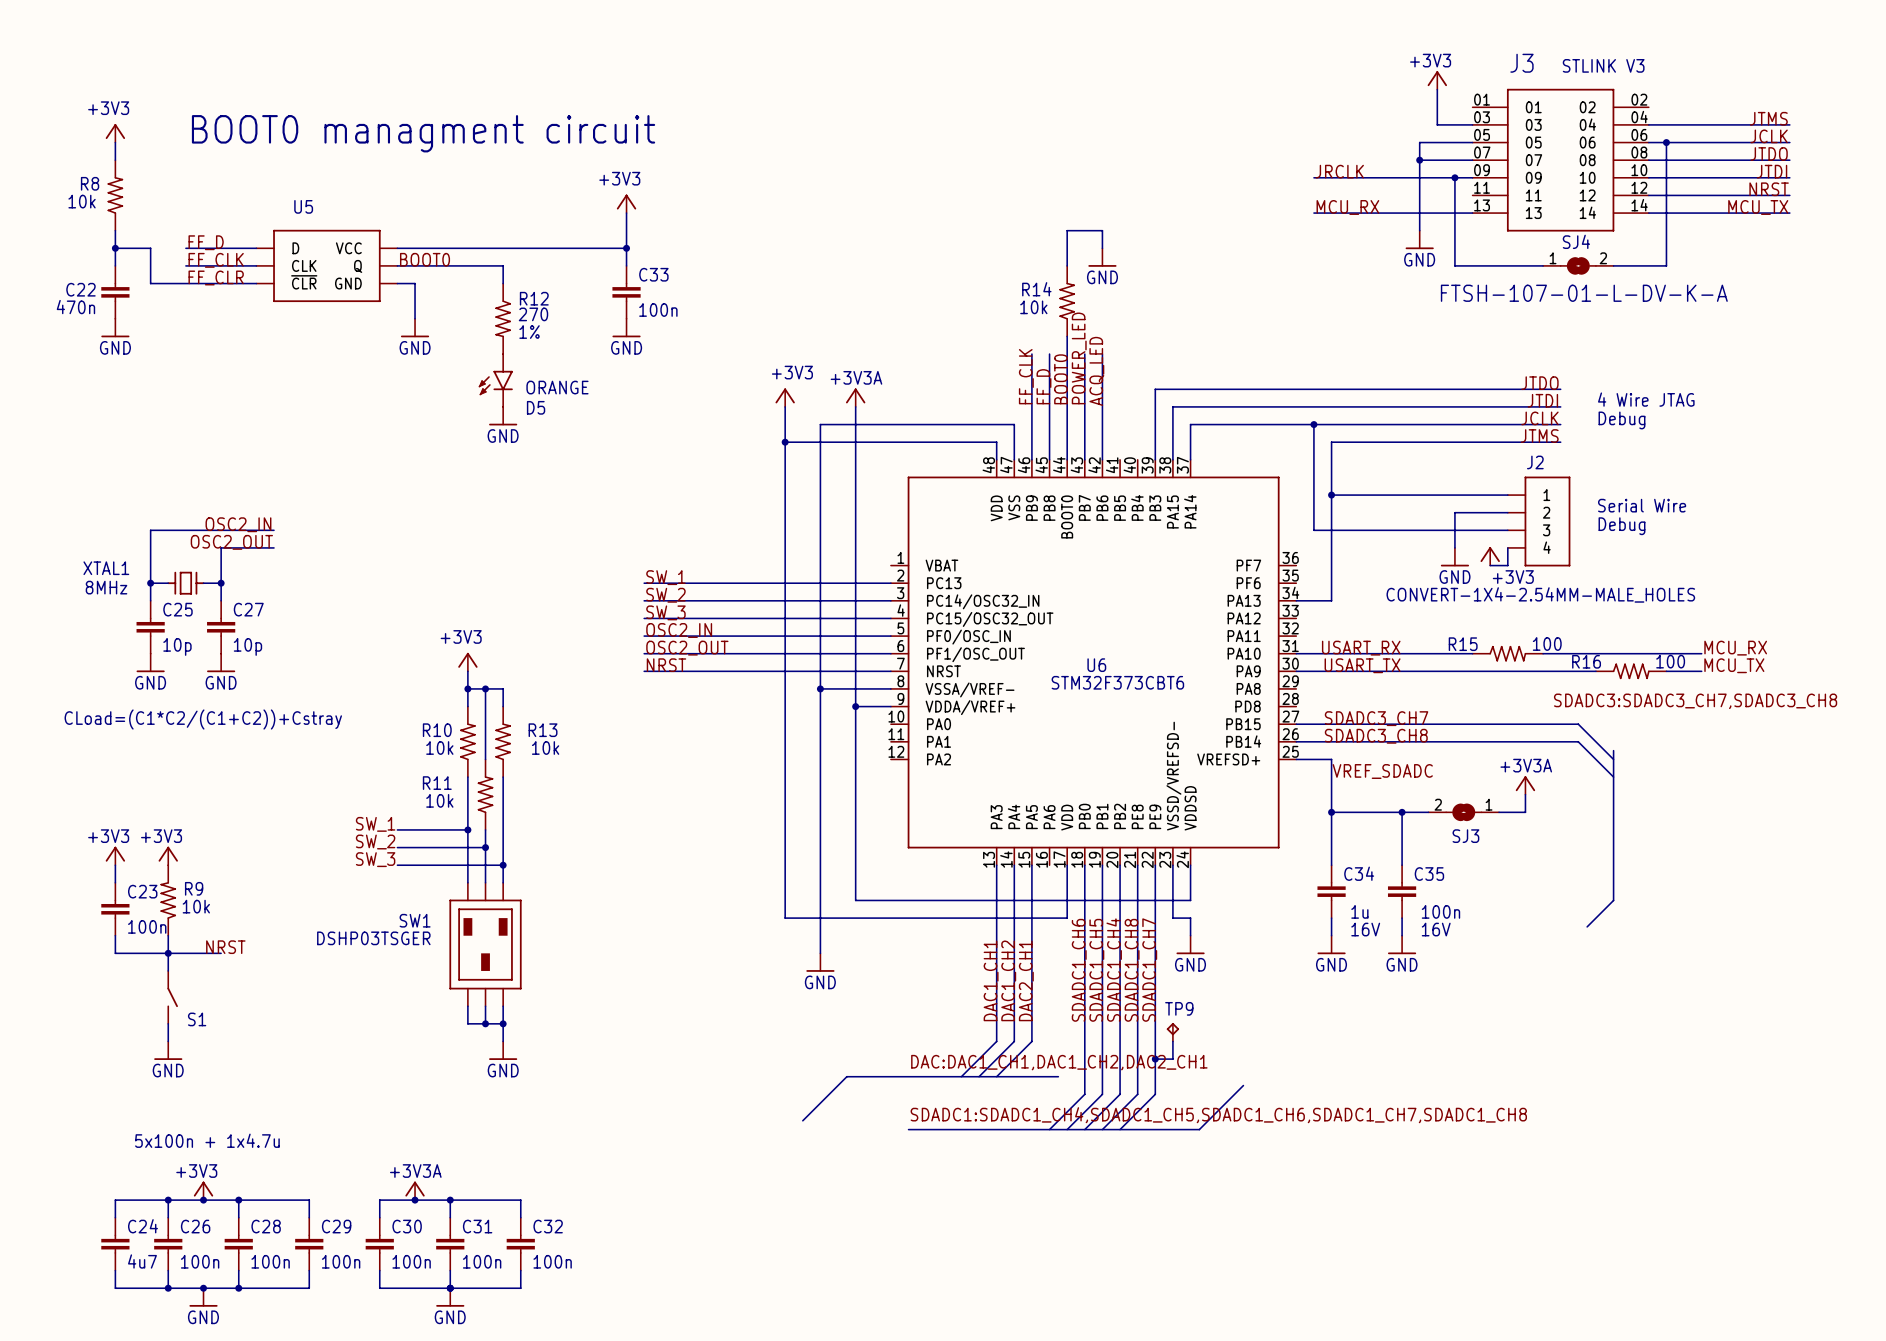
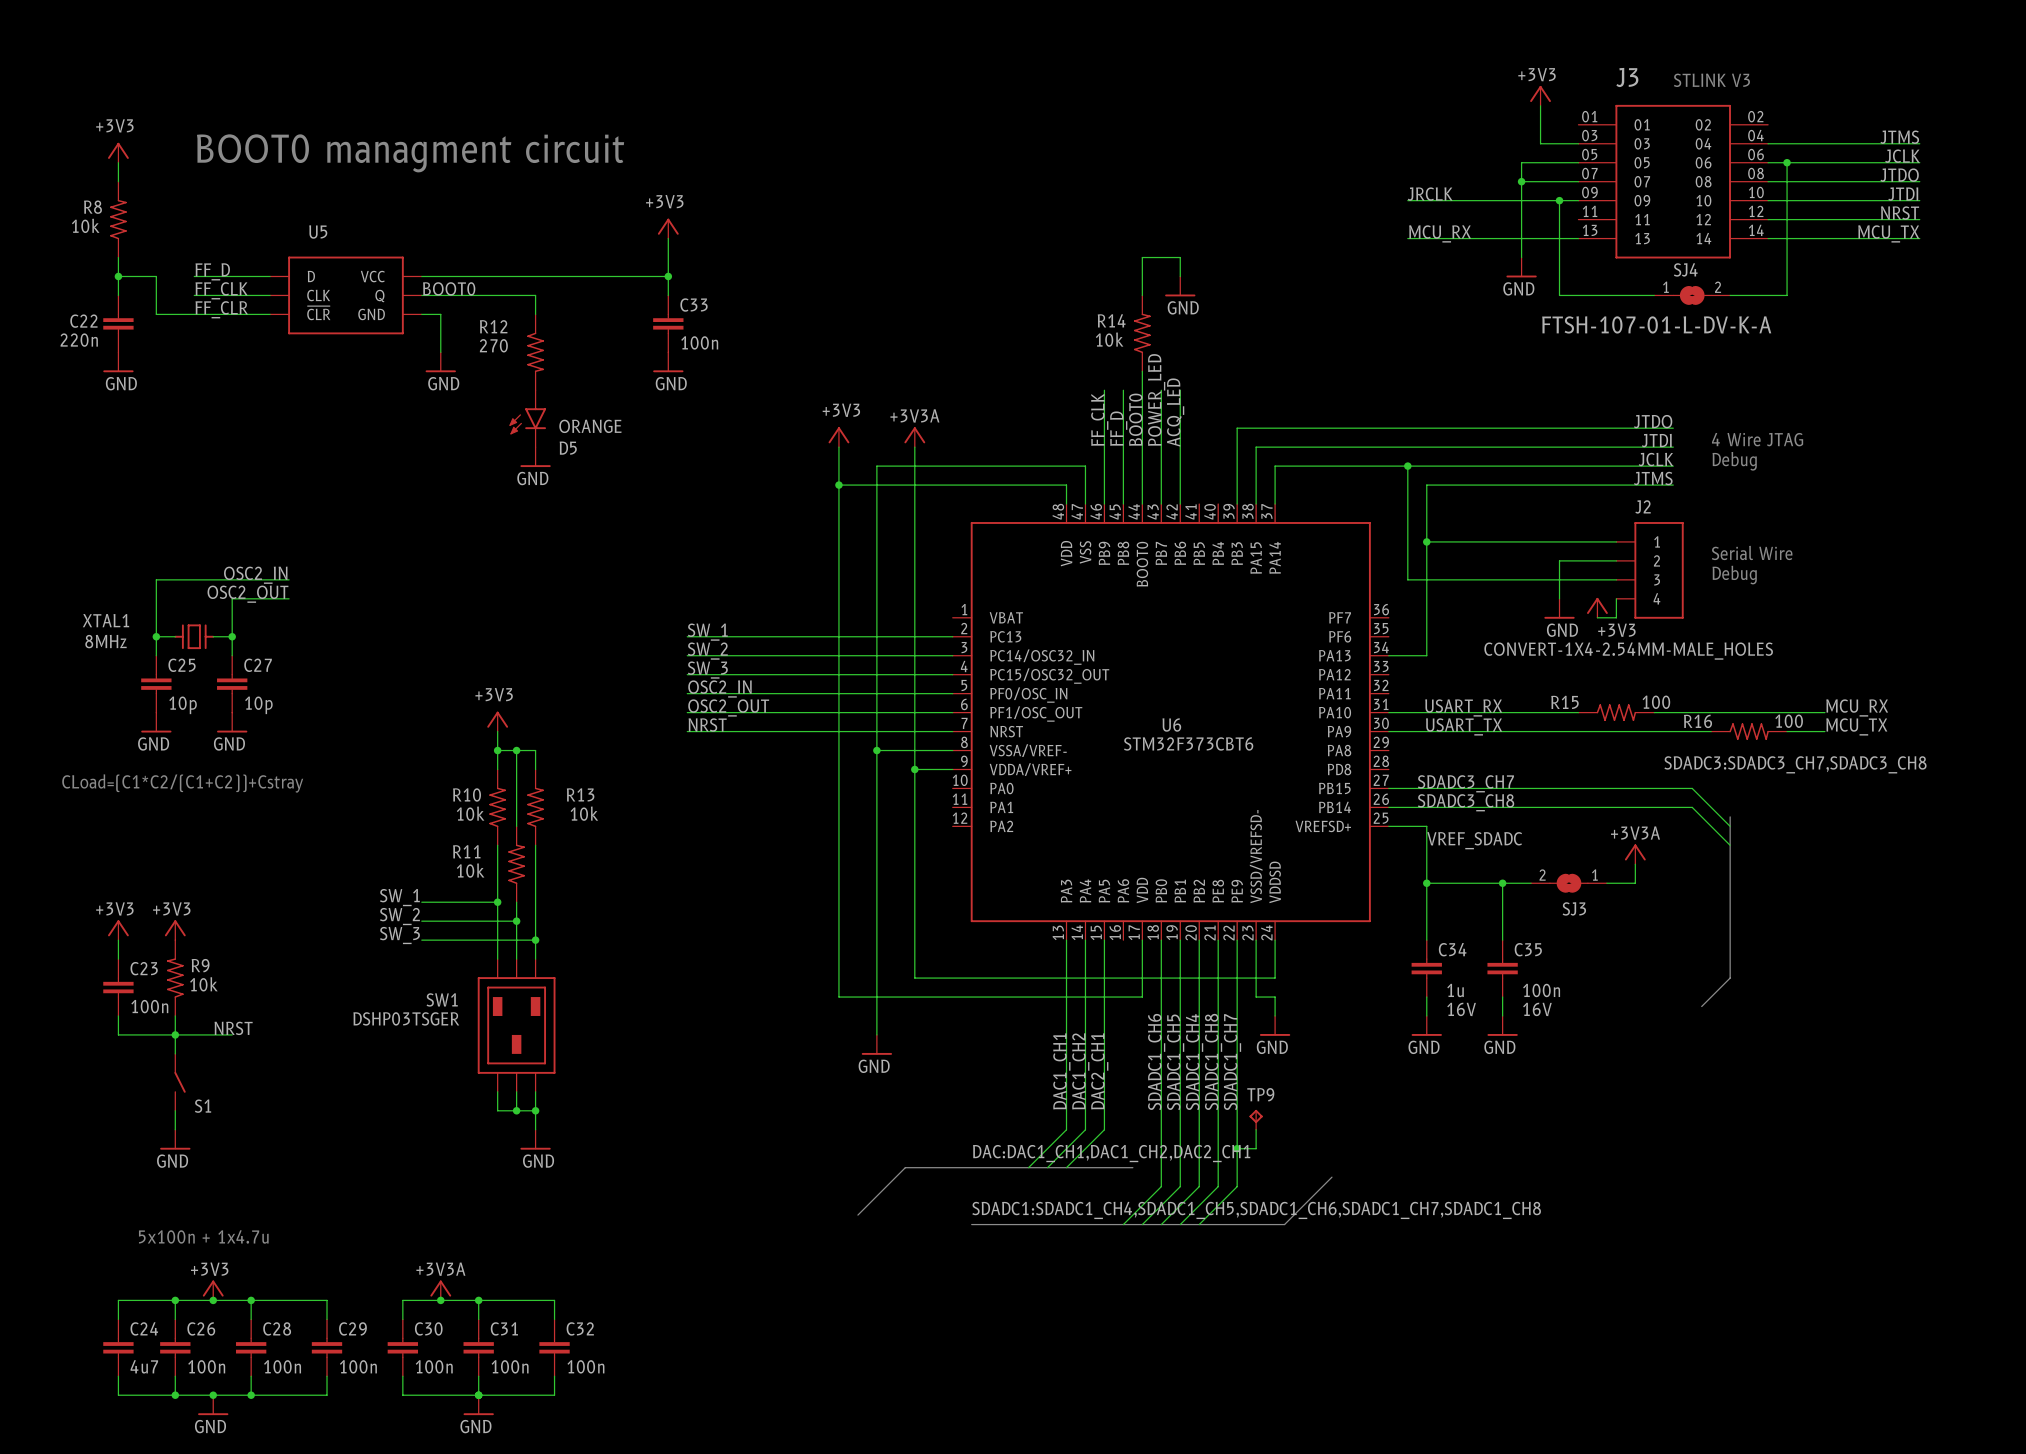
C22 value: 470n (75, 307) -> 220n (79, 340)
R12 flip: as is (503, 318) -> left-right (535, 352)
R12 text: 1% (529, 332) -> none

